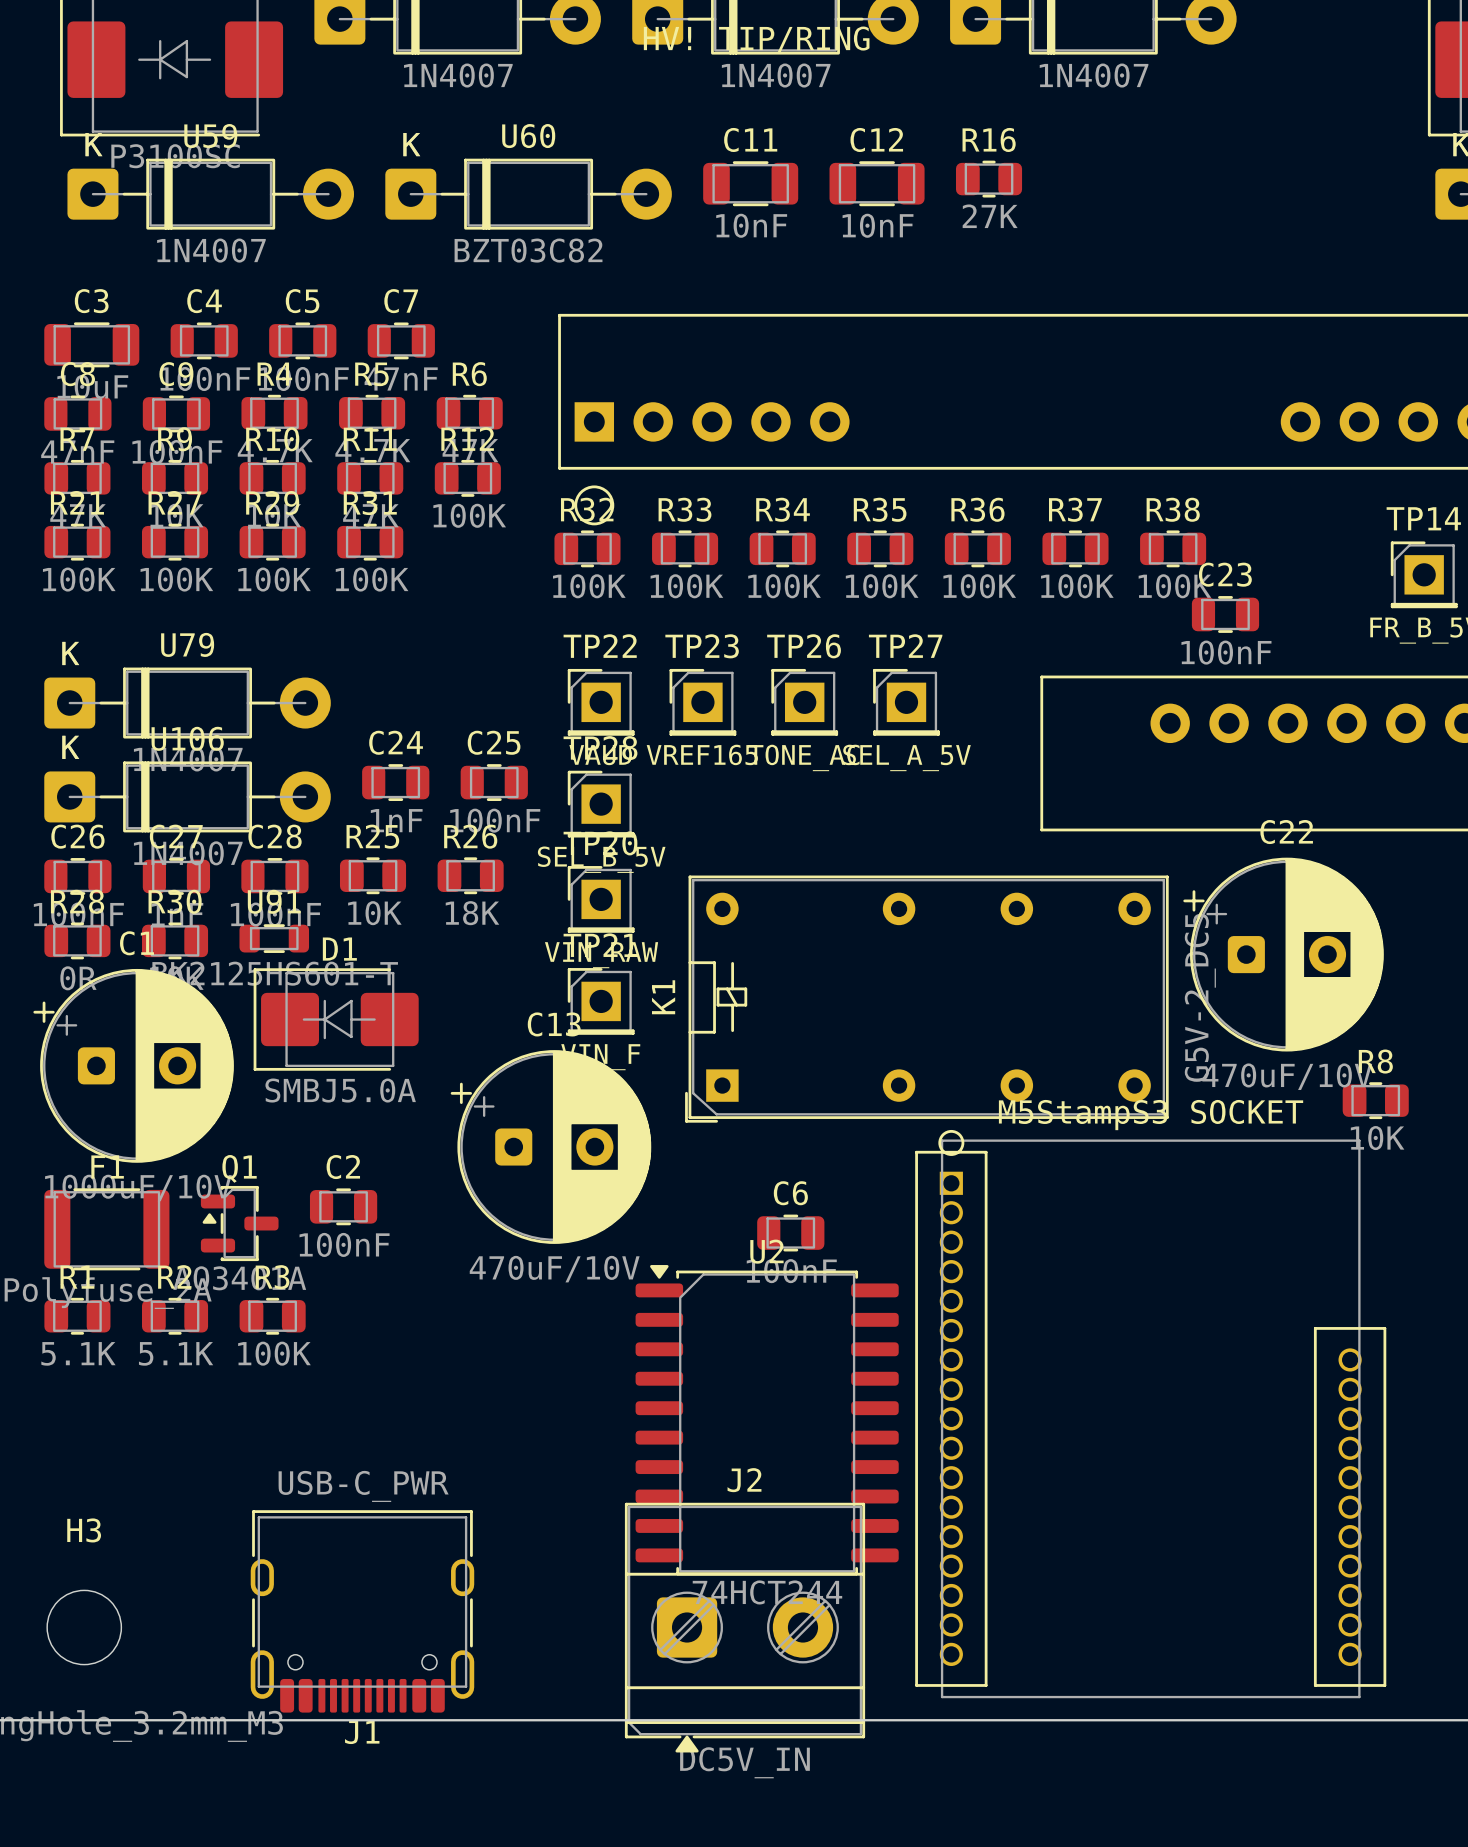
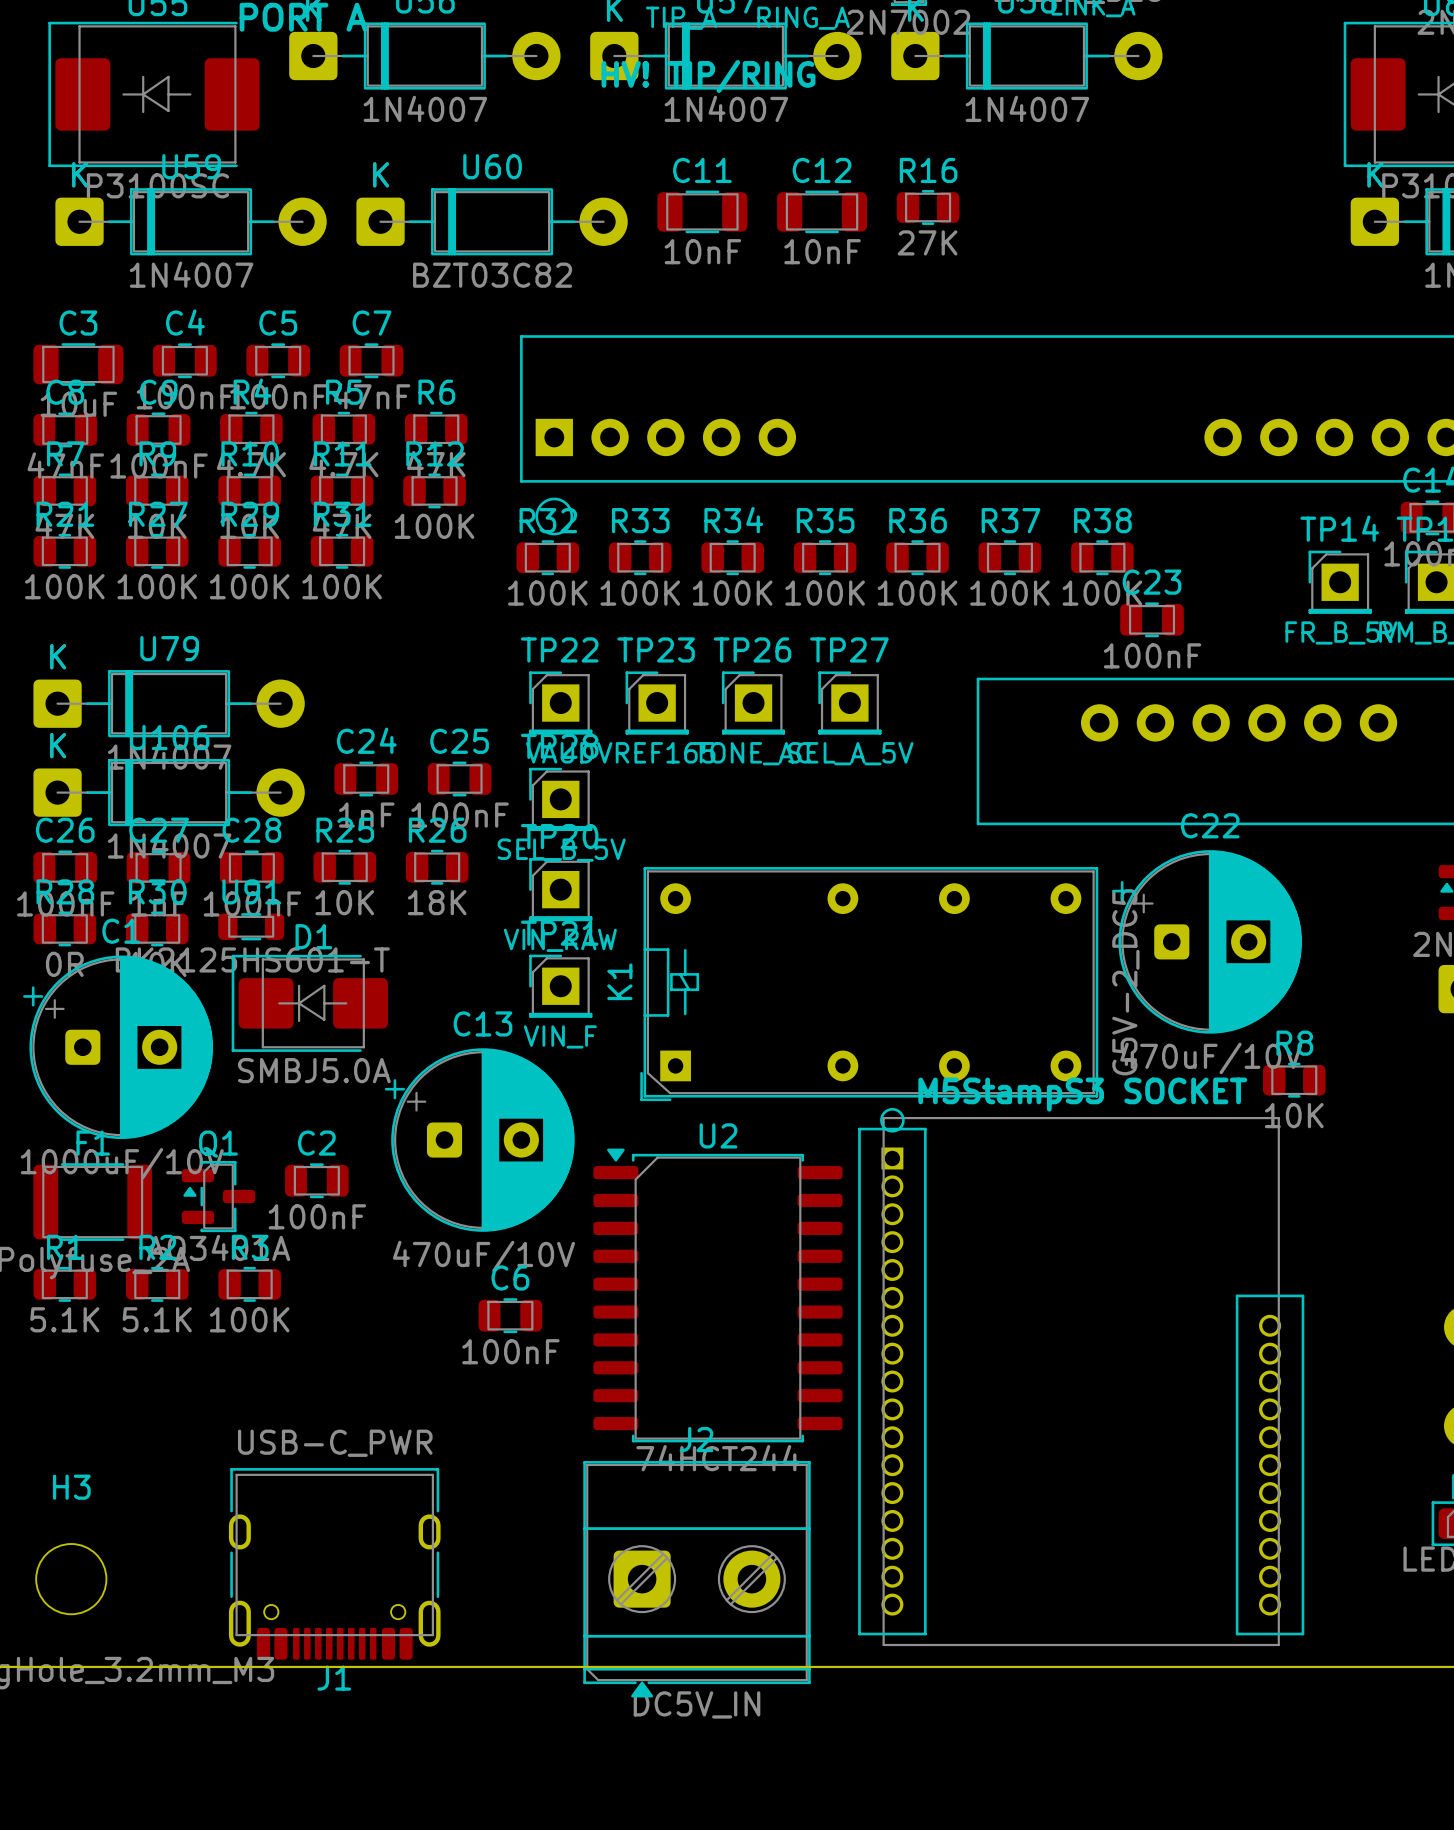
C13 position: (550, 1147) -> (479, 1140)
C6 position: (790, 1233) -> (510, 1315)
U2 position: (767, 1420) -> (717, 1295)

